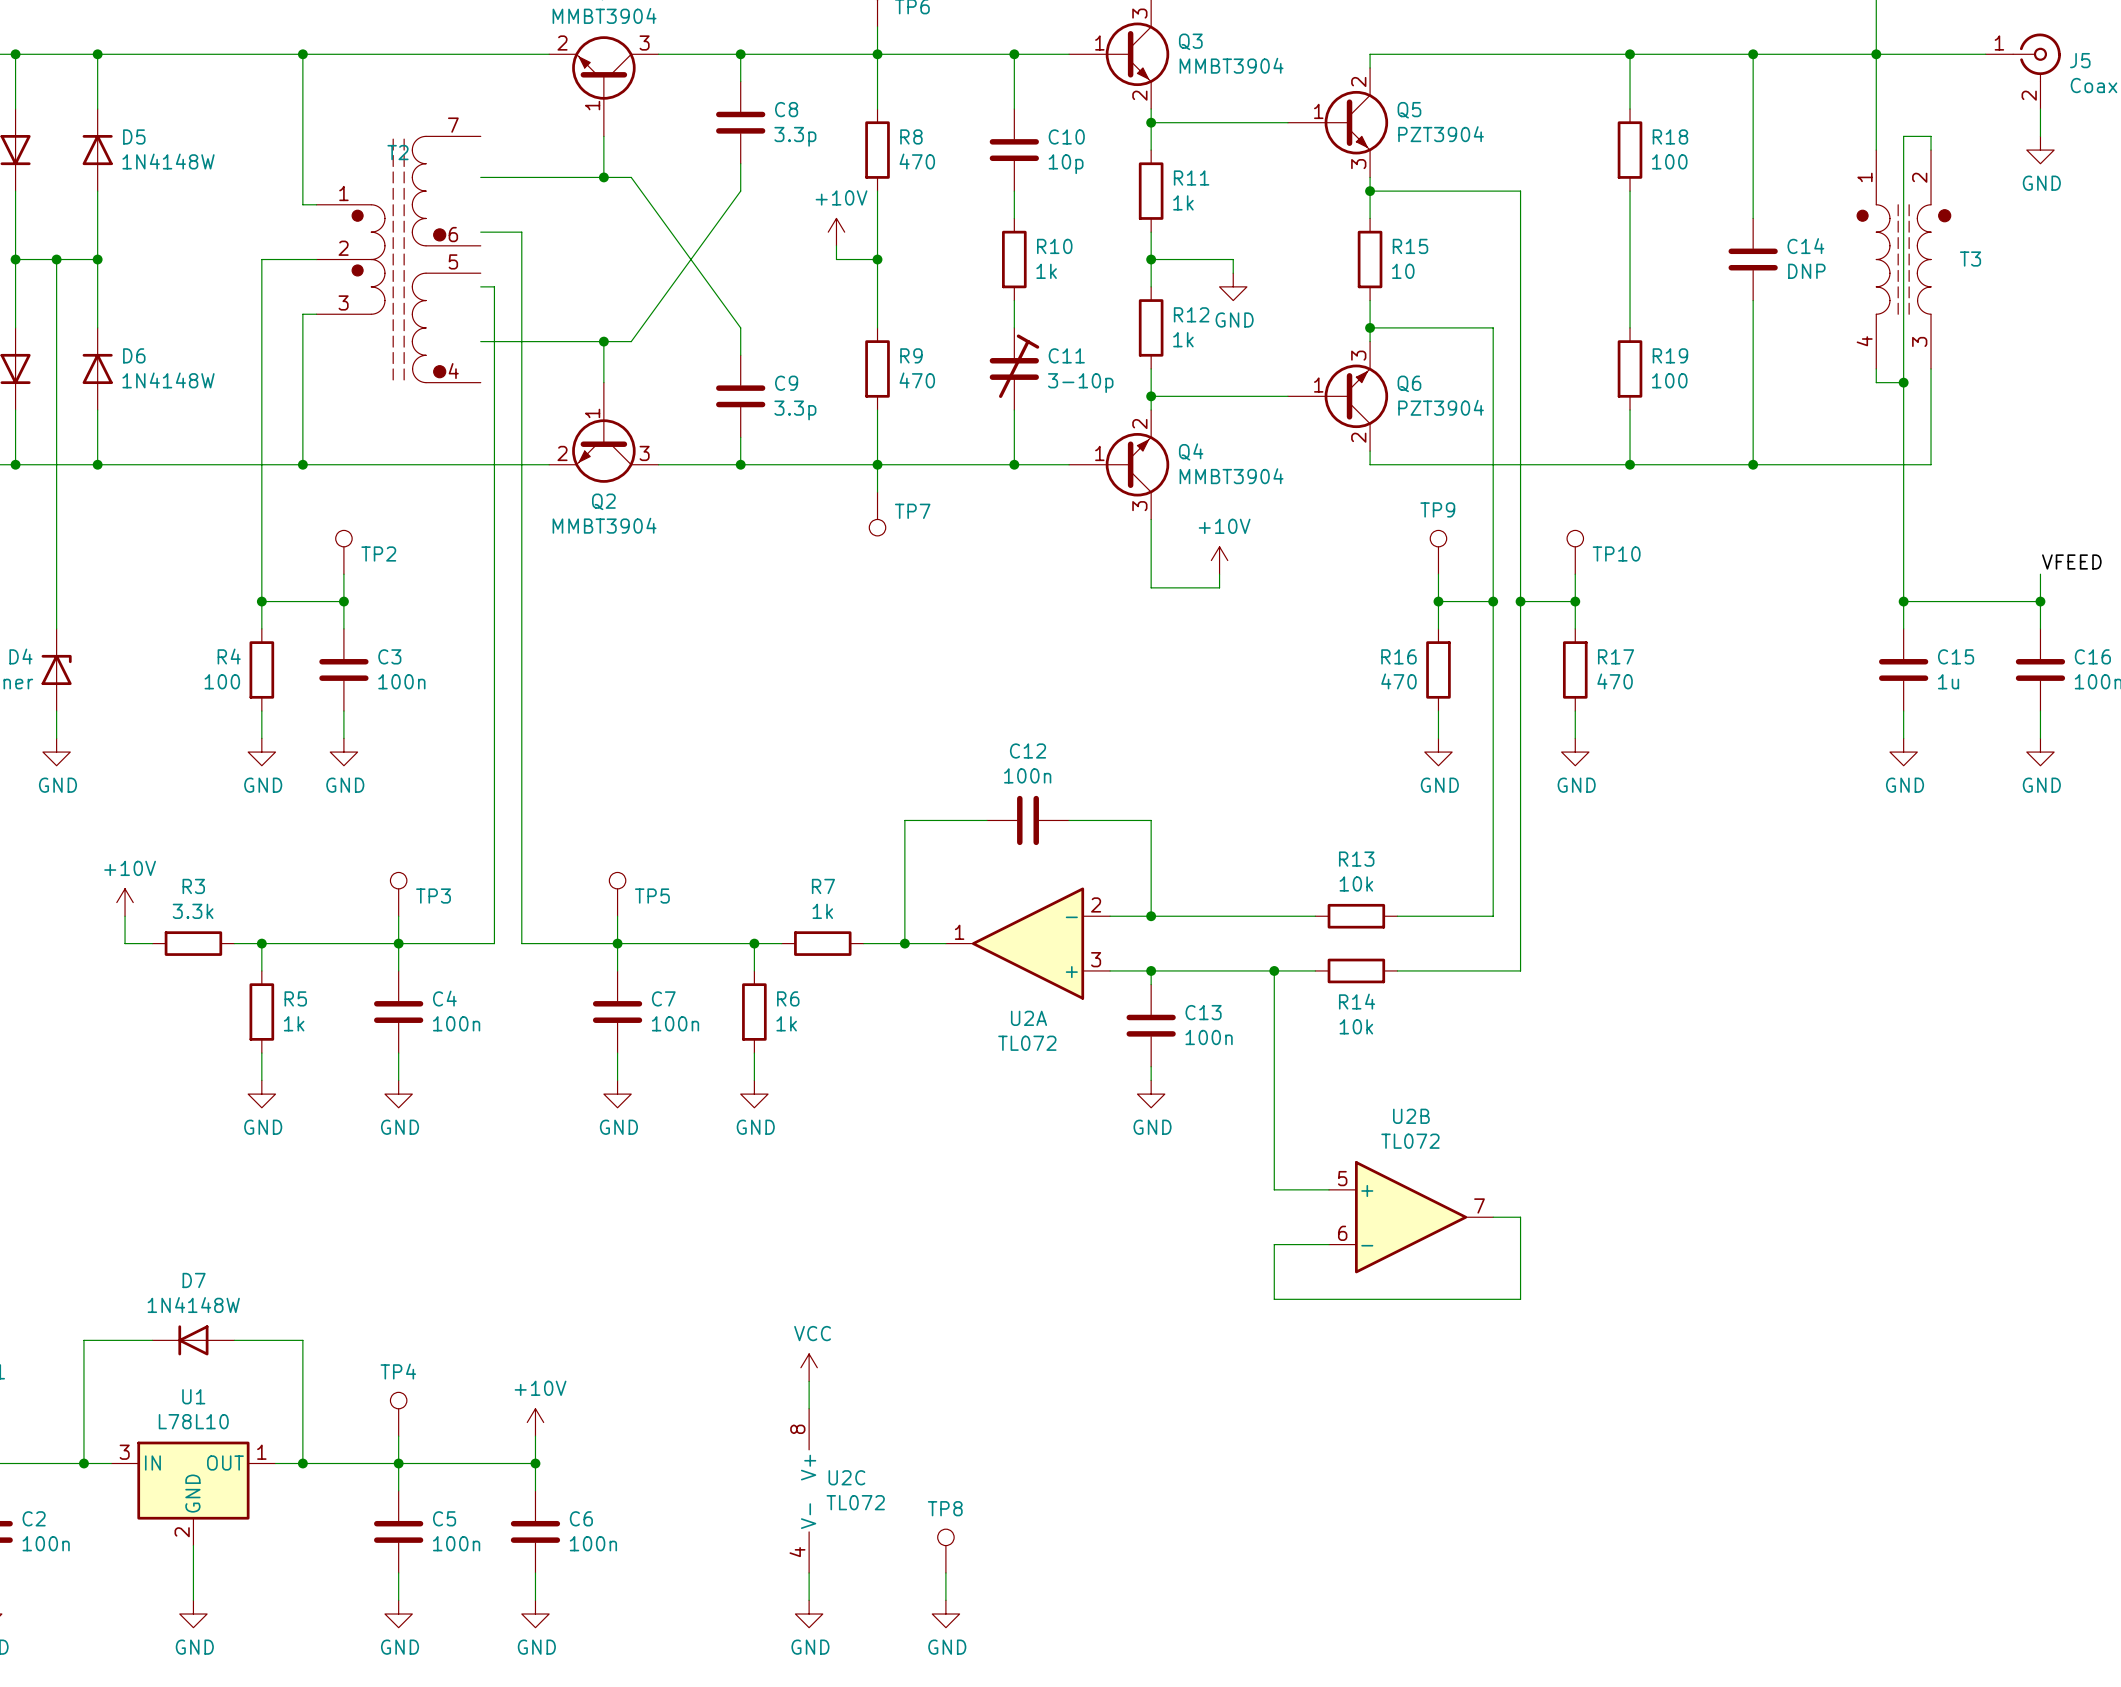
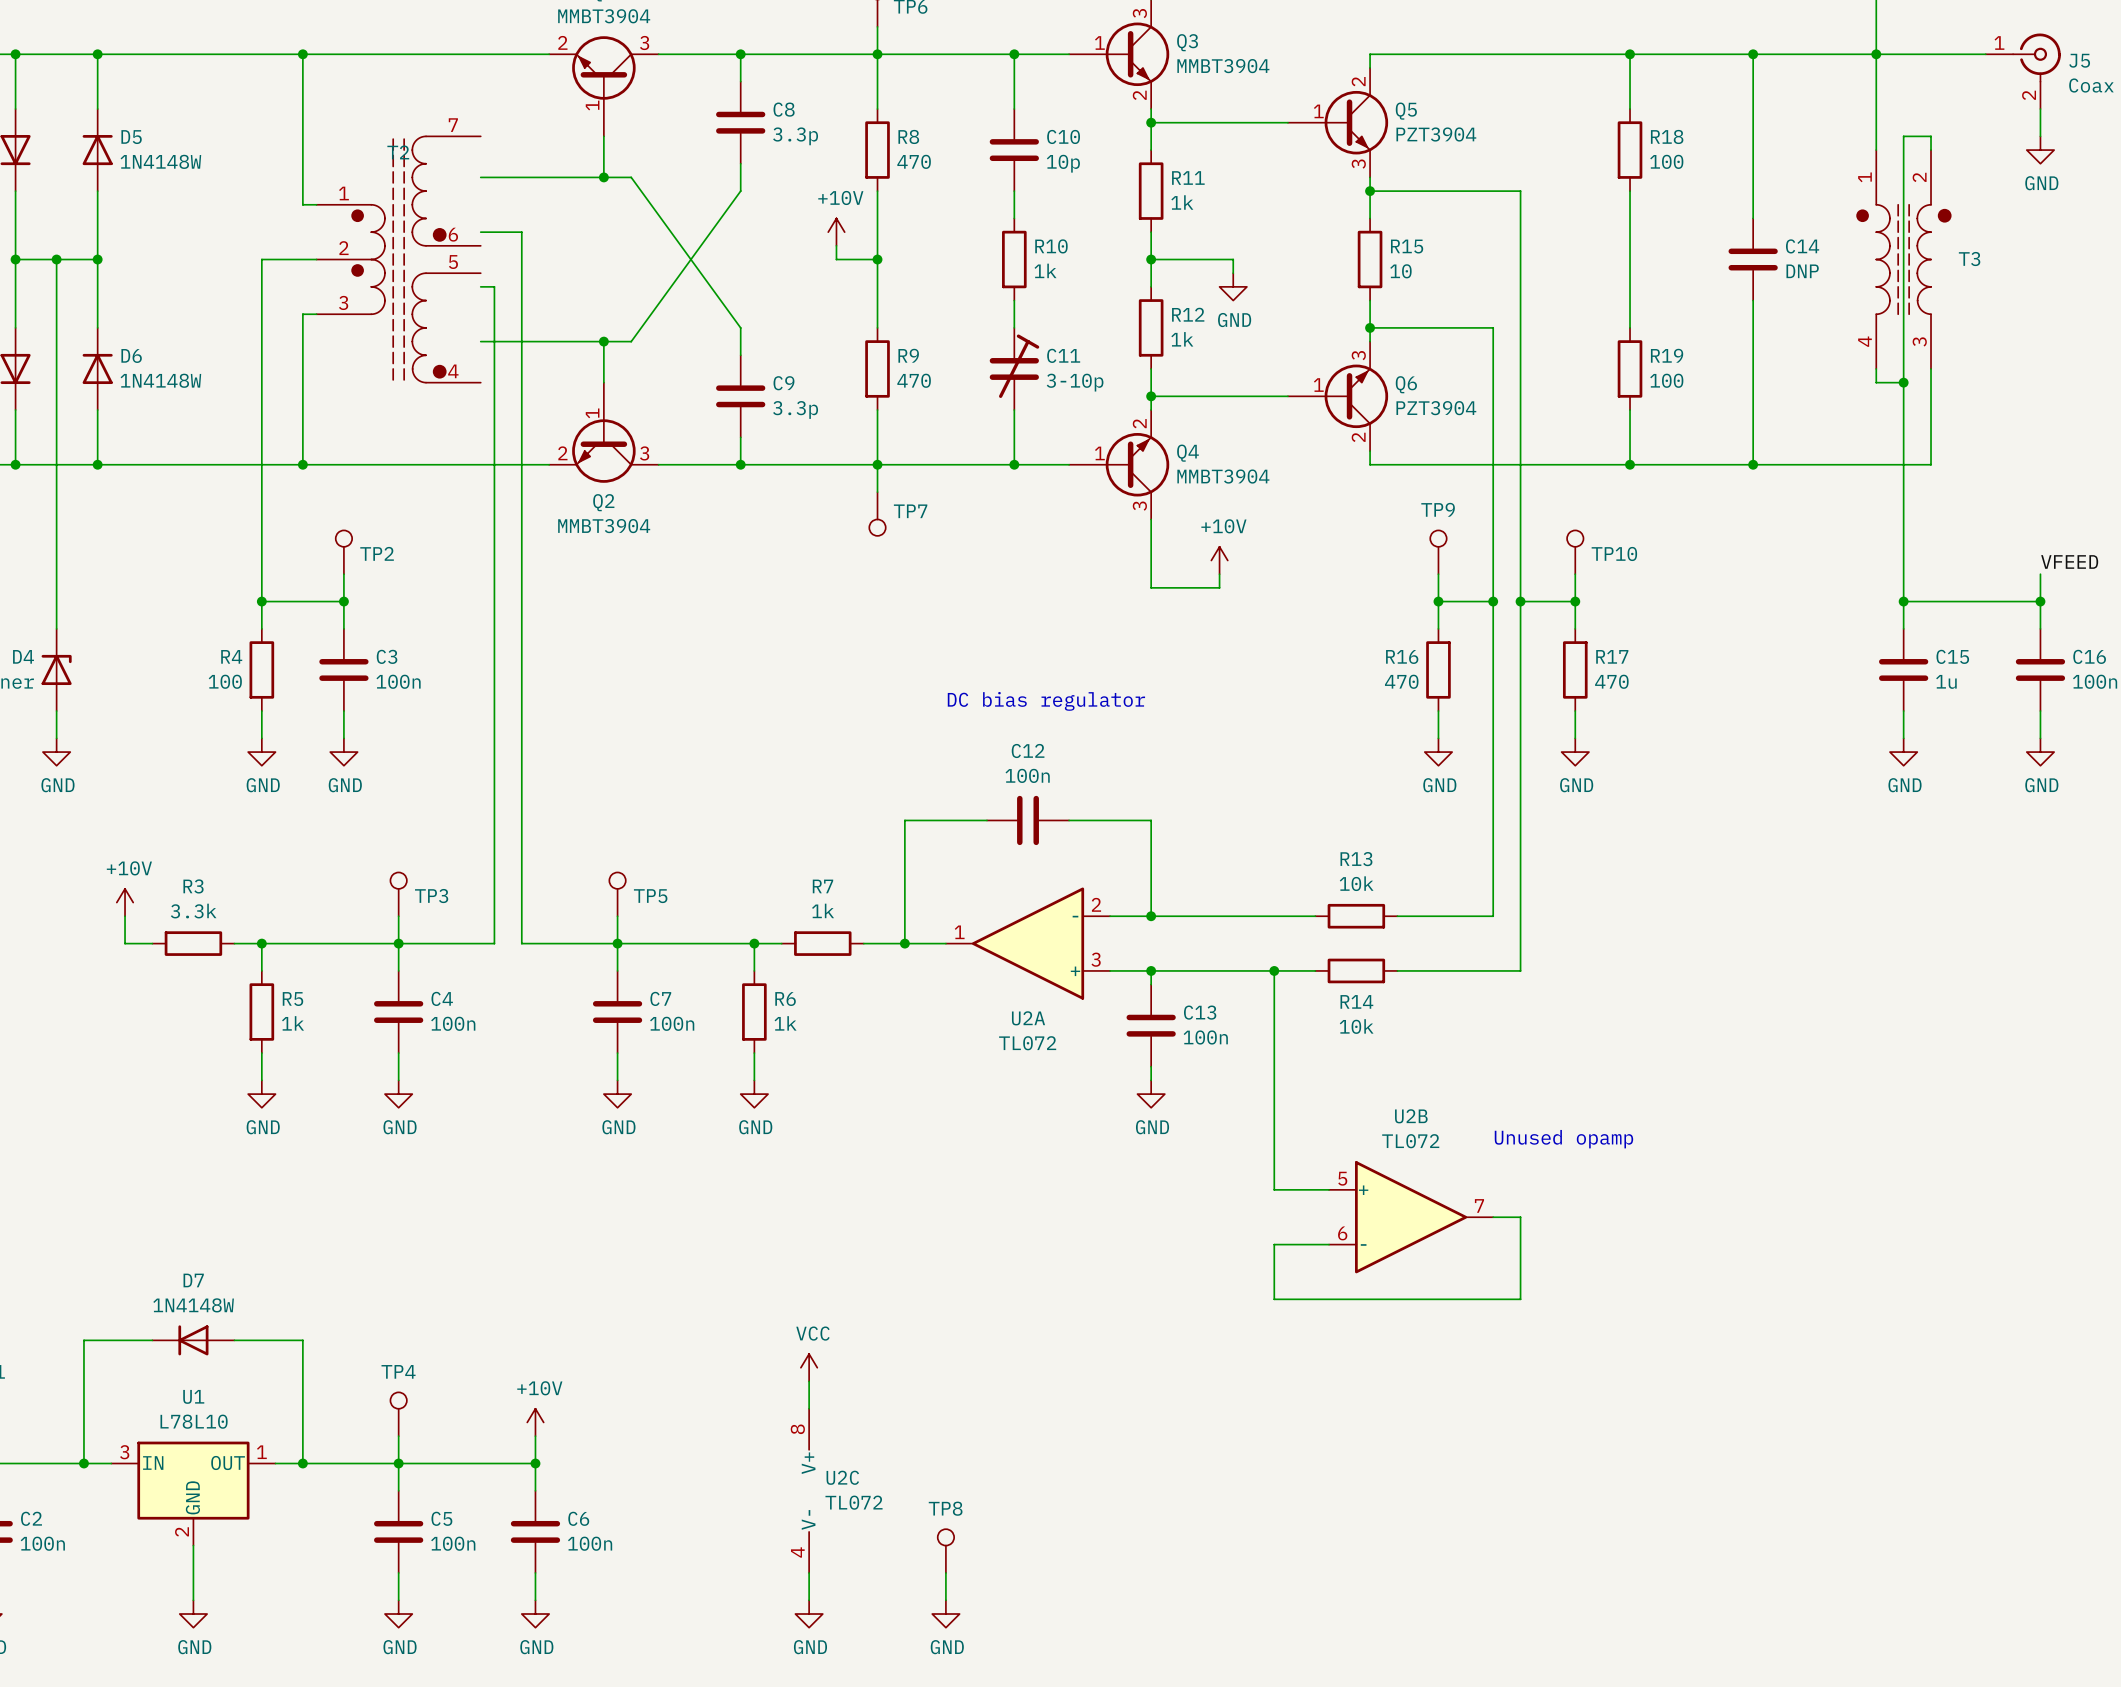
text: none -> DC bias regulator (1046, 701)
text: none -> Unused opamp (1563, 1139)

